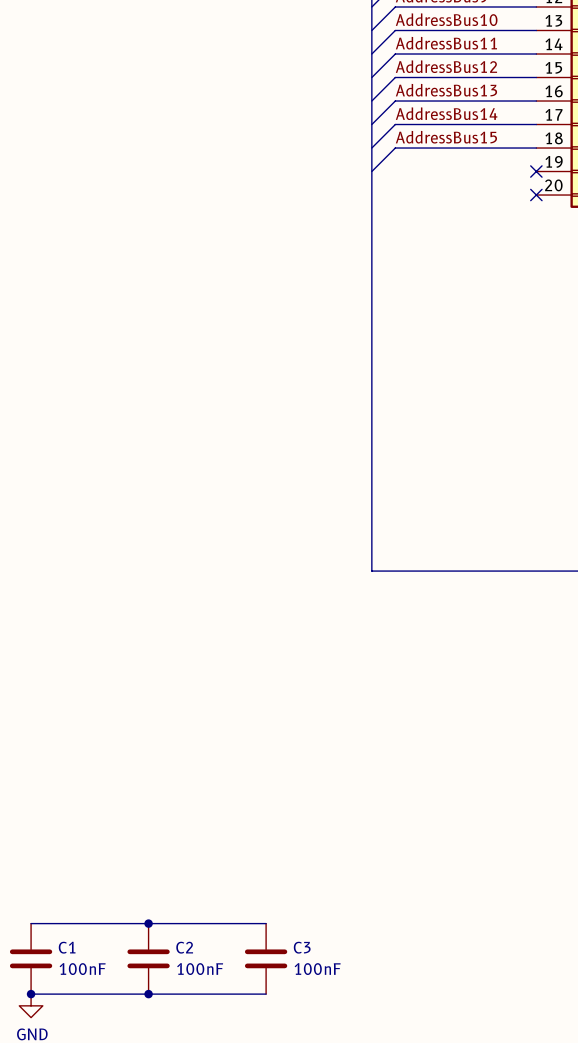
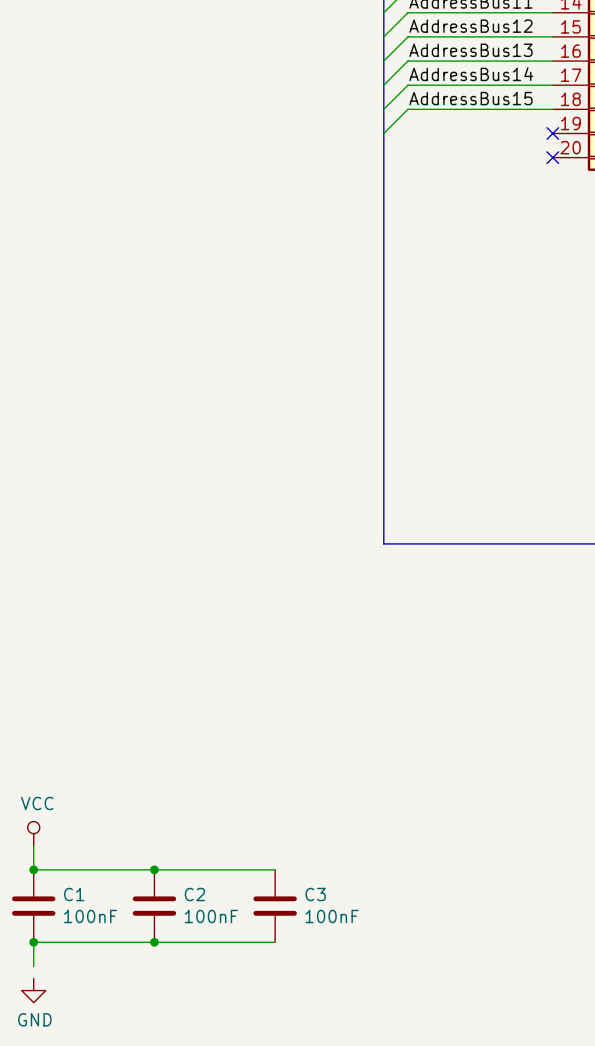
power symbol: none -> VCC (33, 833)
wire: none -> (33, 845) (33, 869) (275, 869)
junction: none -> (33, 869)
junction: none -> (154, 869)
wire: (31, 923) (266, 923) -> none
junction: (148, 923) -> none
C1 position: (31, 958) -> (33, 906)
C2 position: (148, 958) -> (154, 906)
junction: none -> (154, 942)
wire: none -> (275, 942) (33, 942) (33, 966)
C3 position: (266, 958) -> (275, 906)
wire: (31, 994) (266, 994) -> none
junction position: (31, 994) -> (33, 942)
junction: (148, 994) -> none

